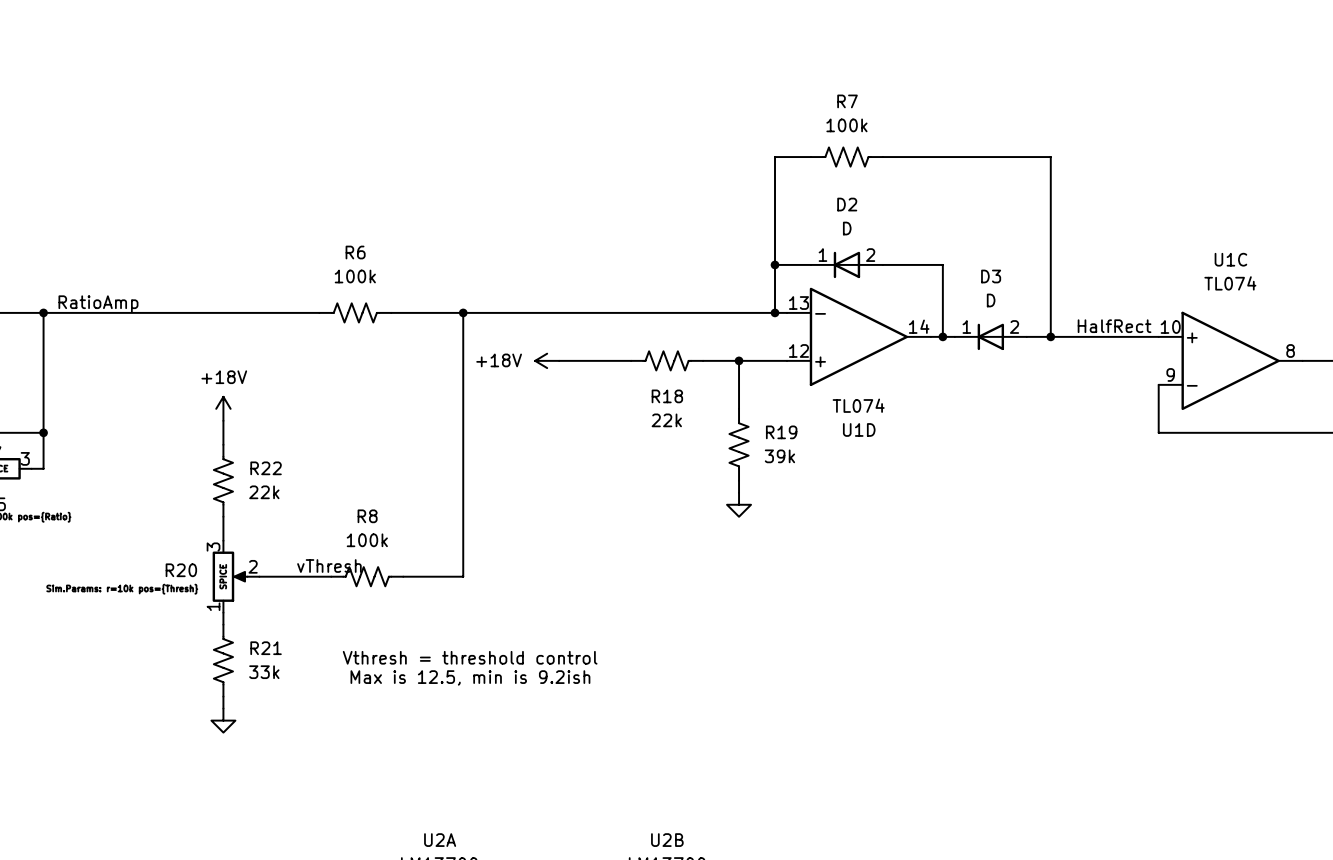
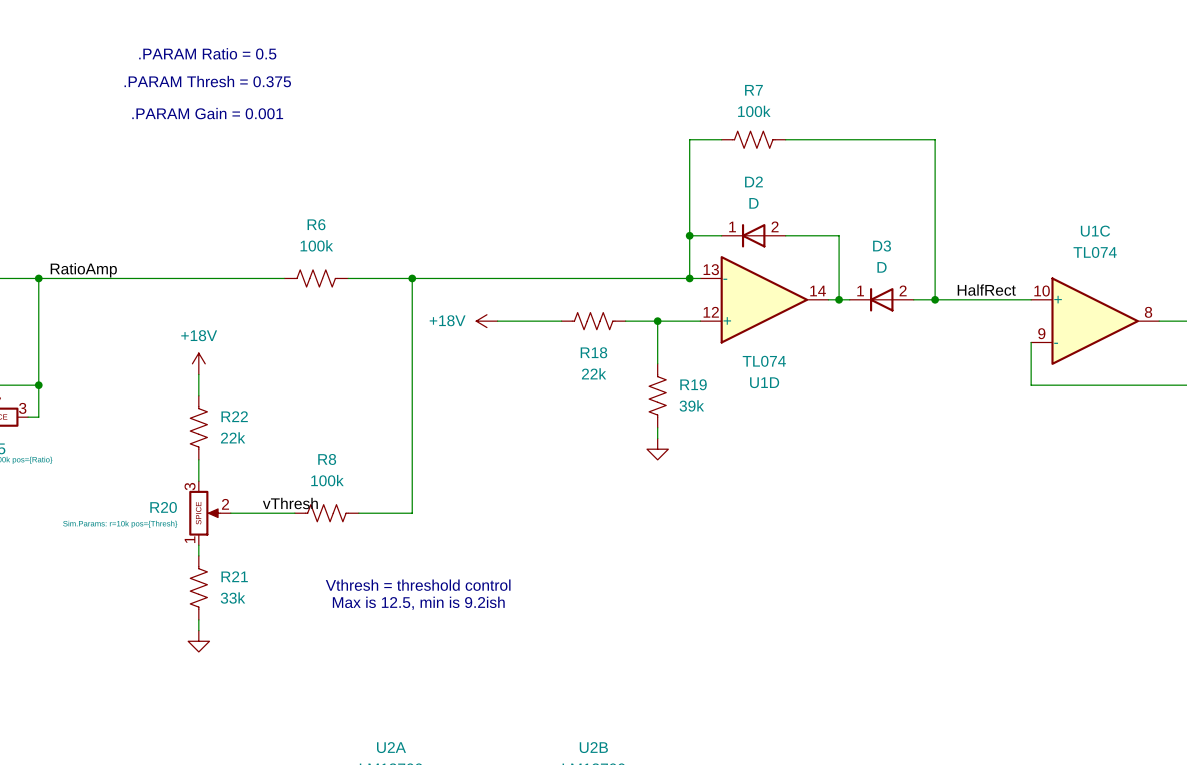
text: none -> .PARAM Ratio = 0.5 (207, 53)
text: none -> .PARAM Thresh = 0.375 (207, 81)
text: none -> .PARAM Gain = 0.001 (207, 113)

